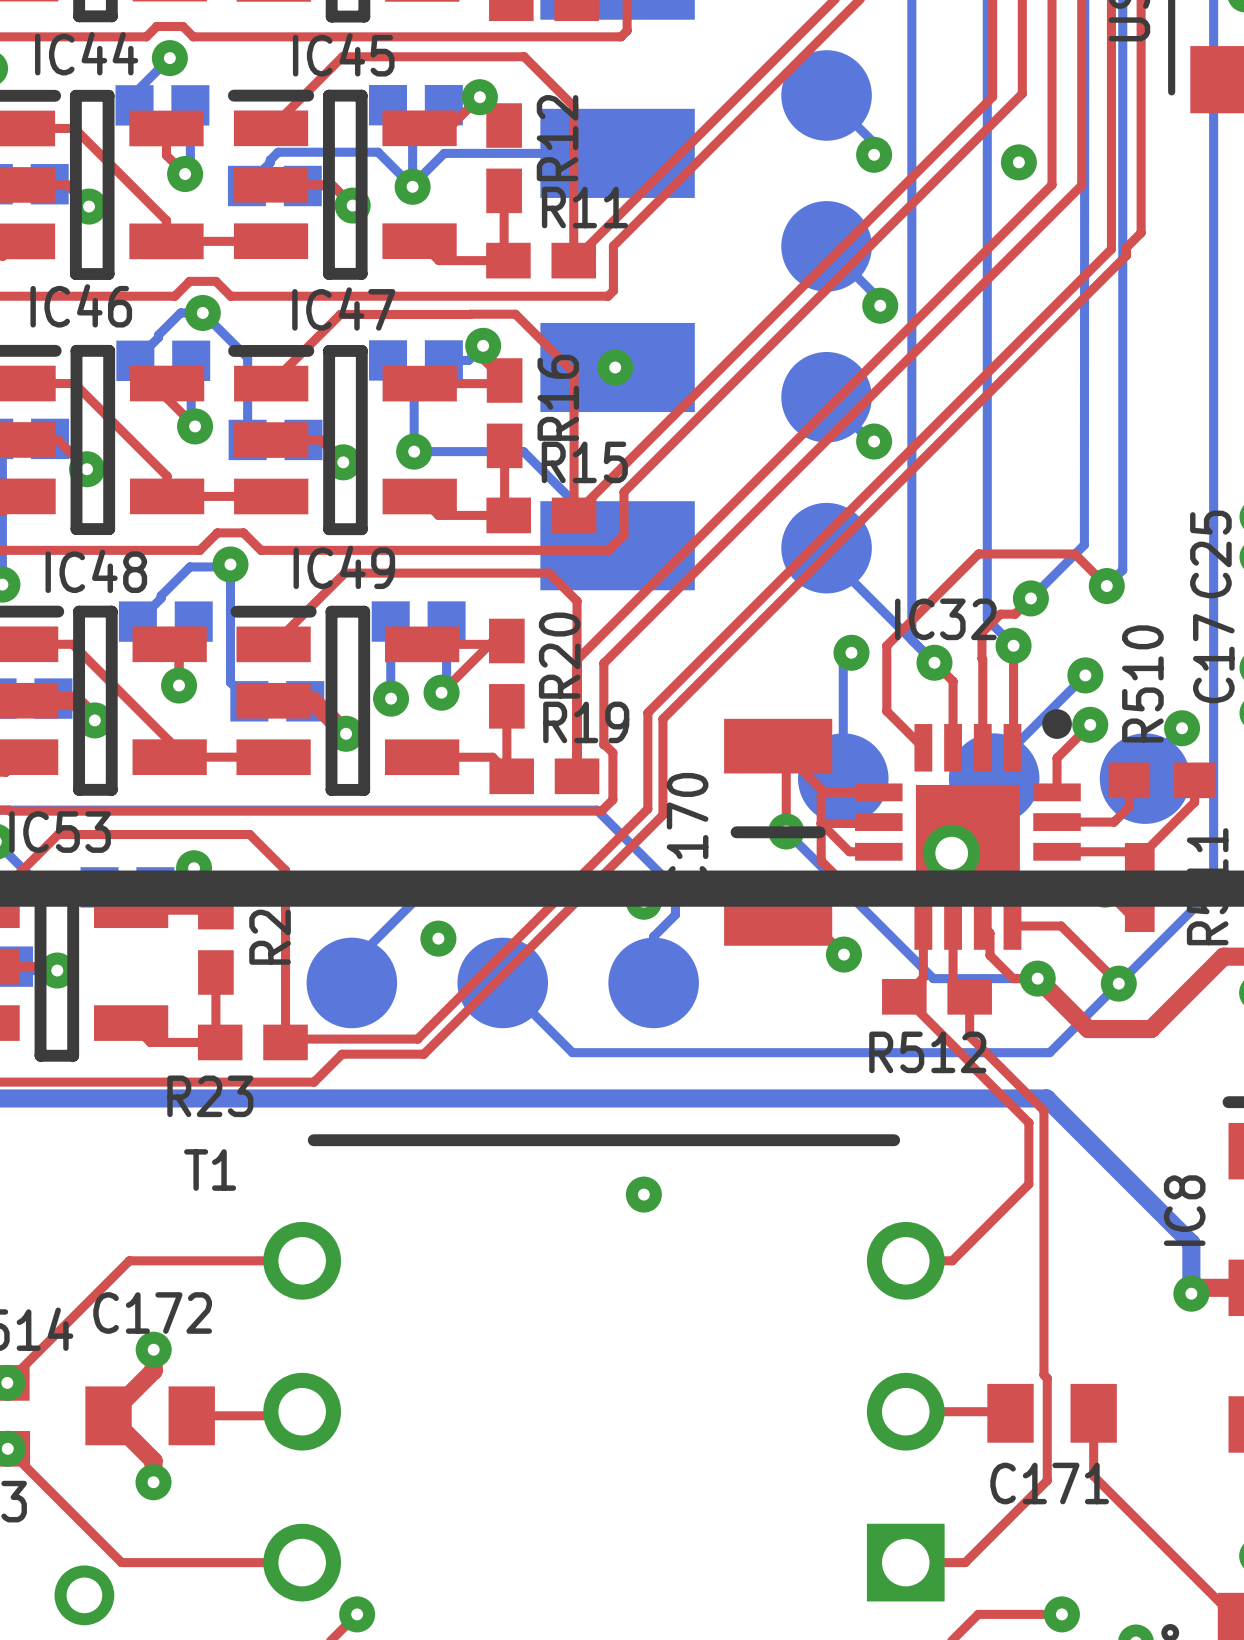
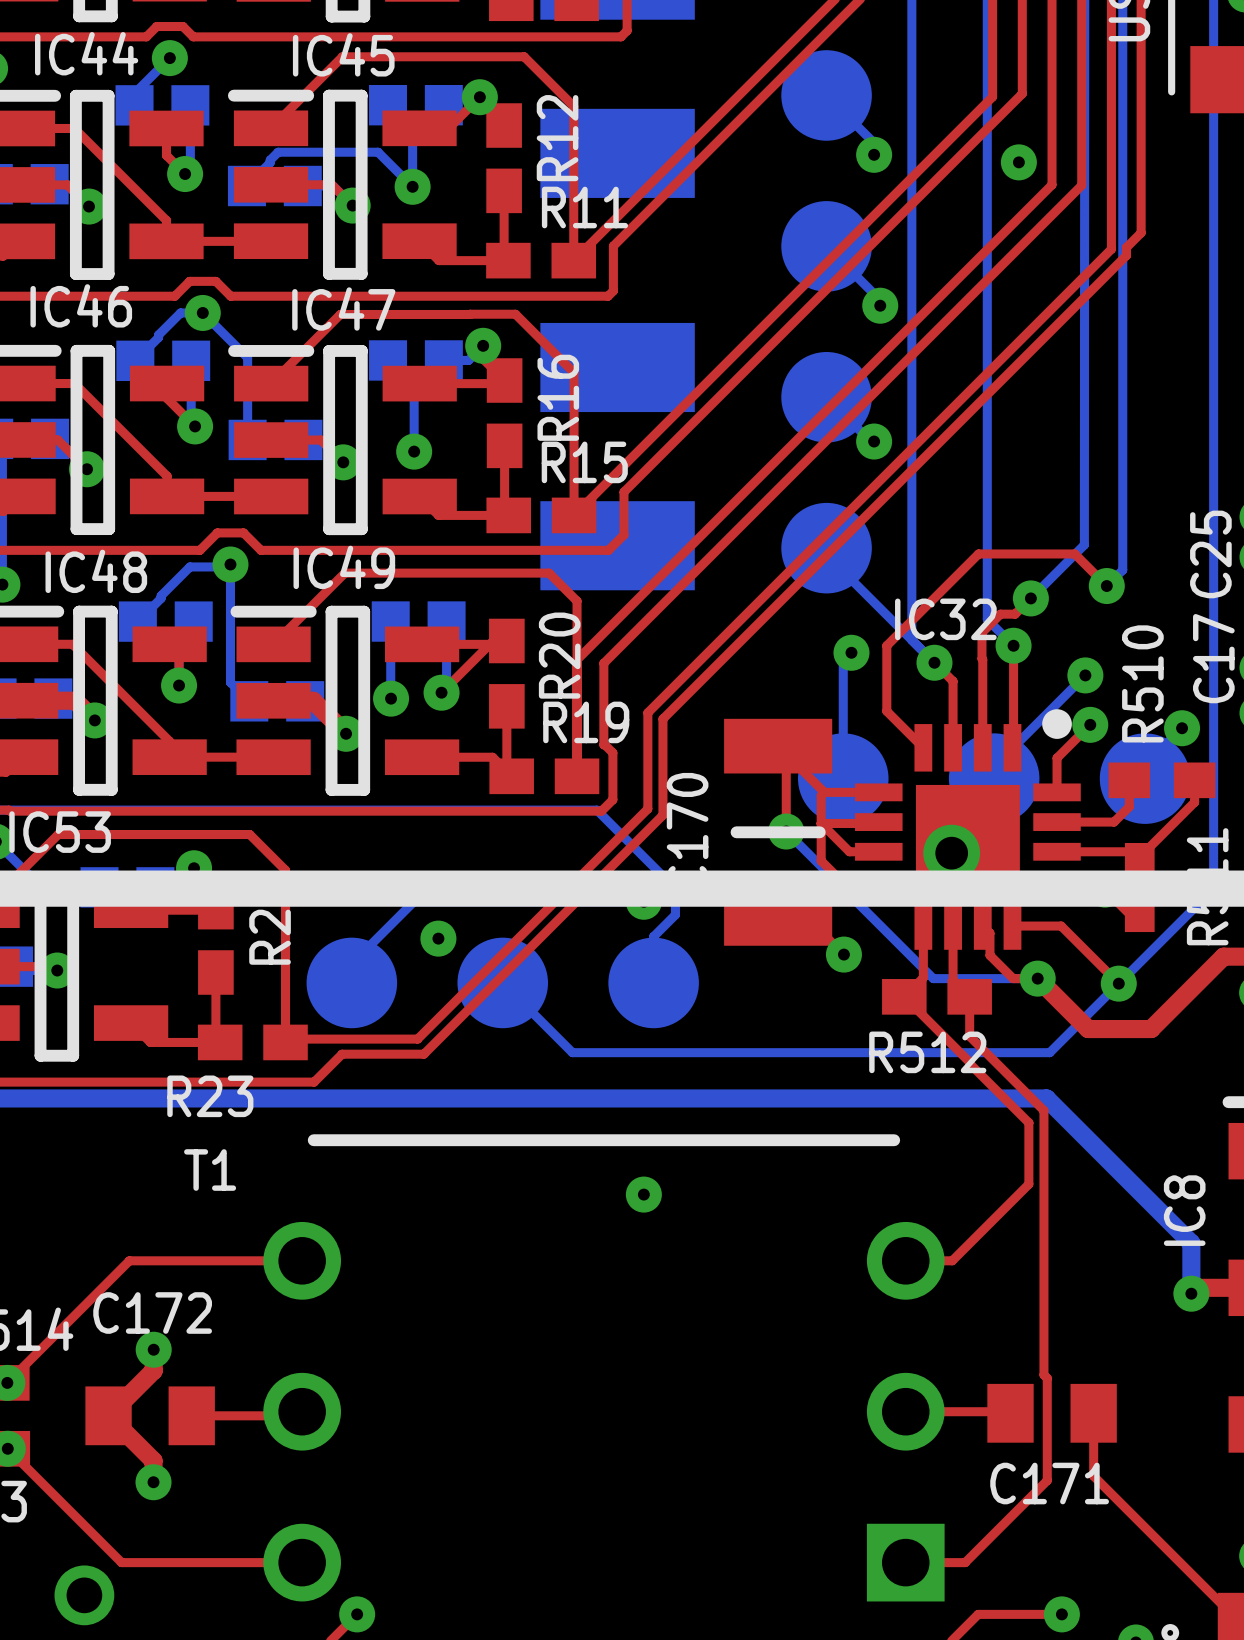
bottom track: (617, 153) (444, 153) (412, 184) -> none
via: (615, 367) -> none
bottom track: (414, 451) (523, 451) (617, 545) -> none

